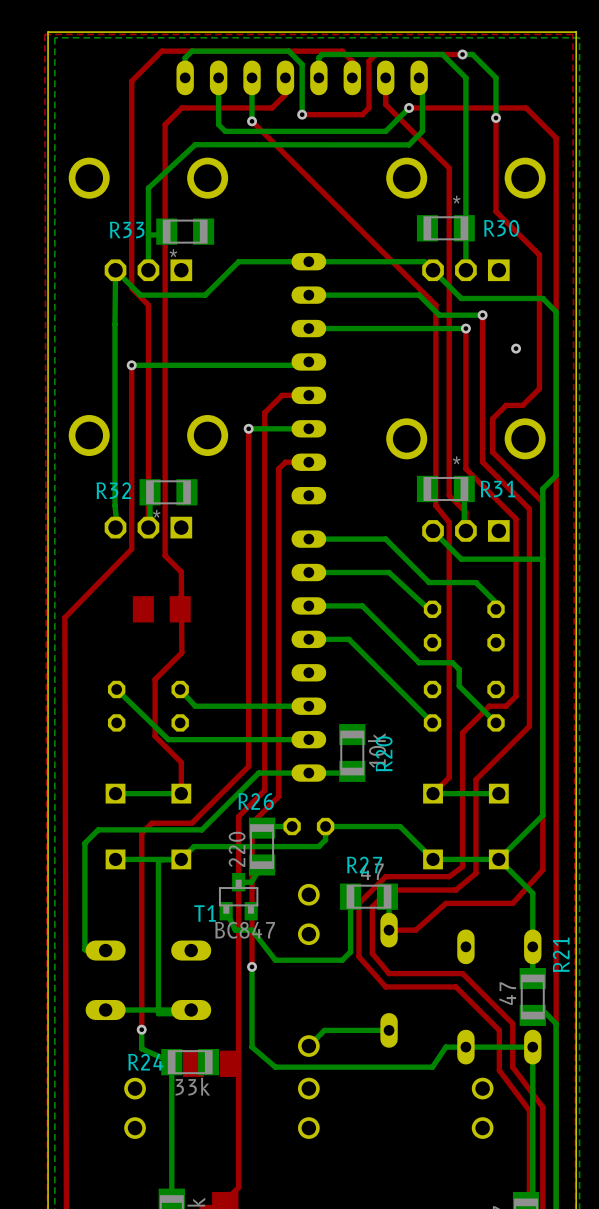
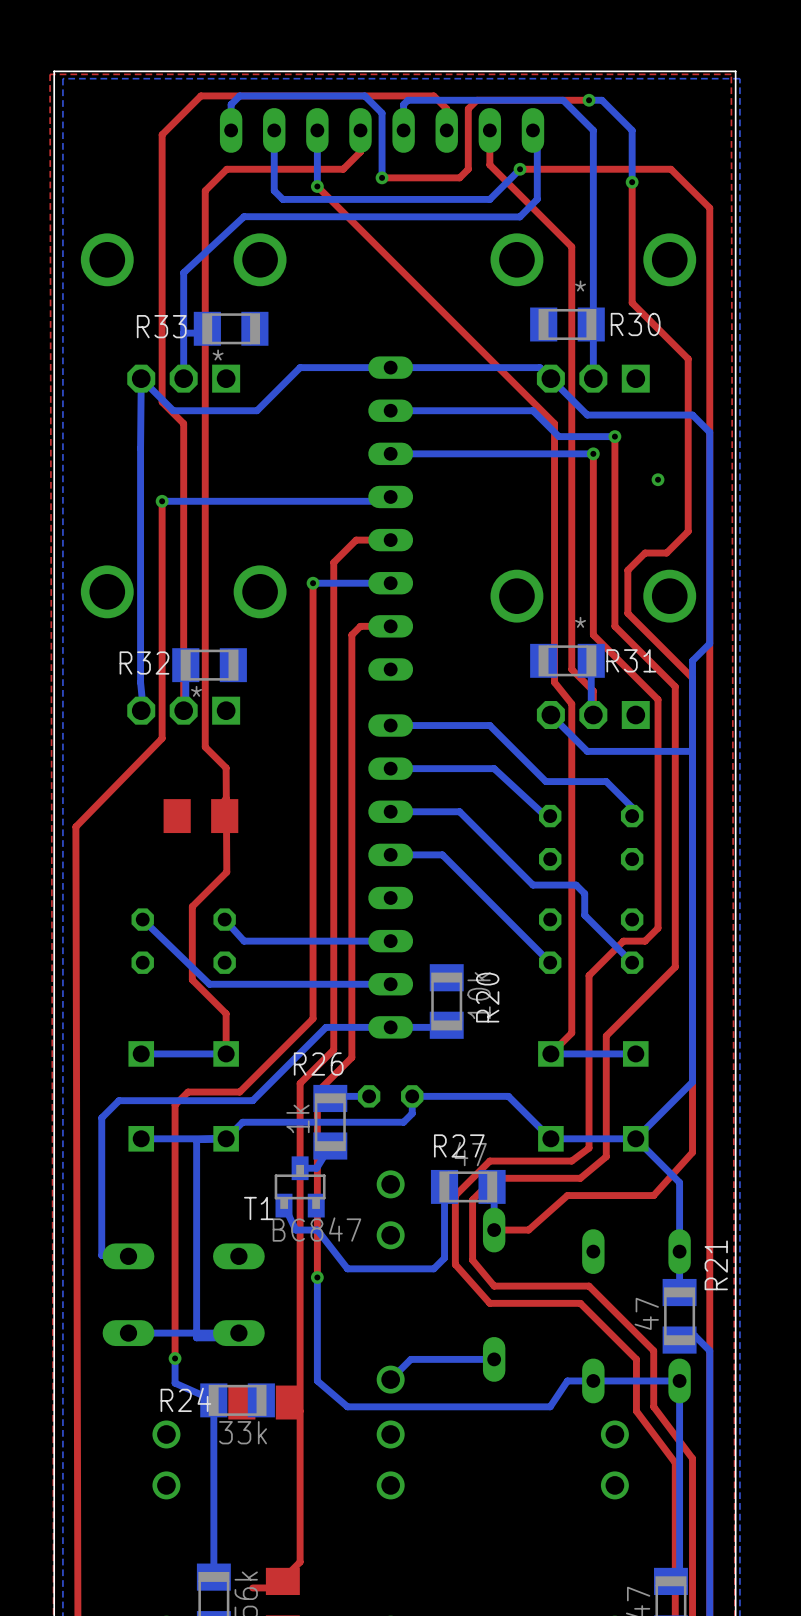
R26 value: 220 (237, 849) -> 1k (297, 1118)

